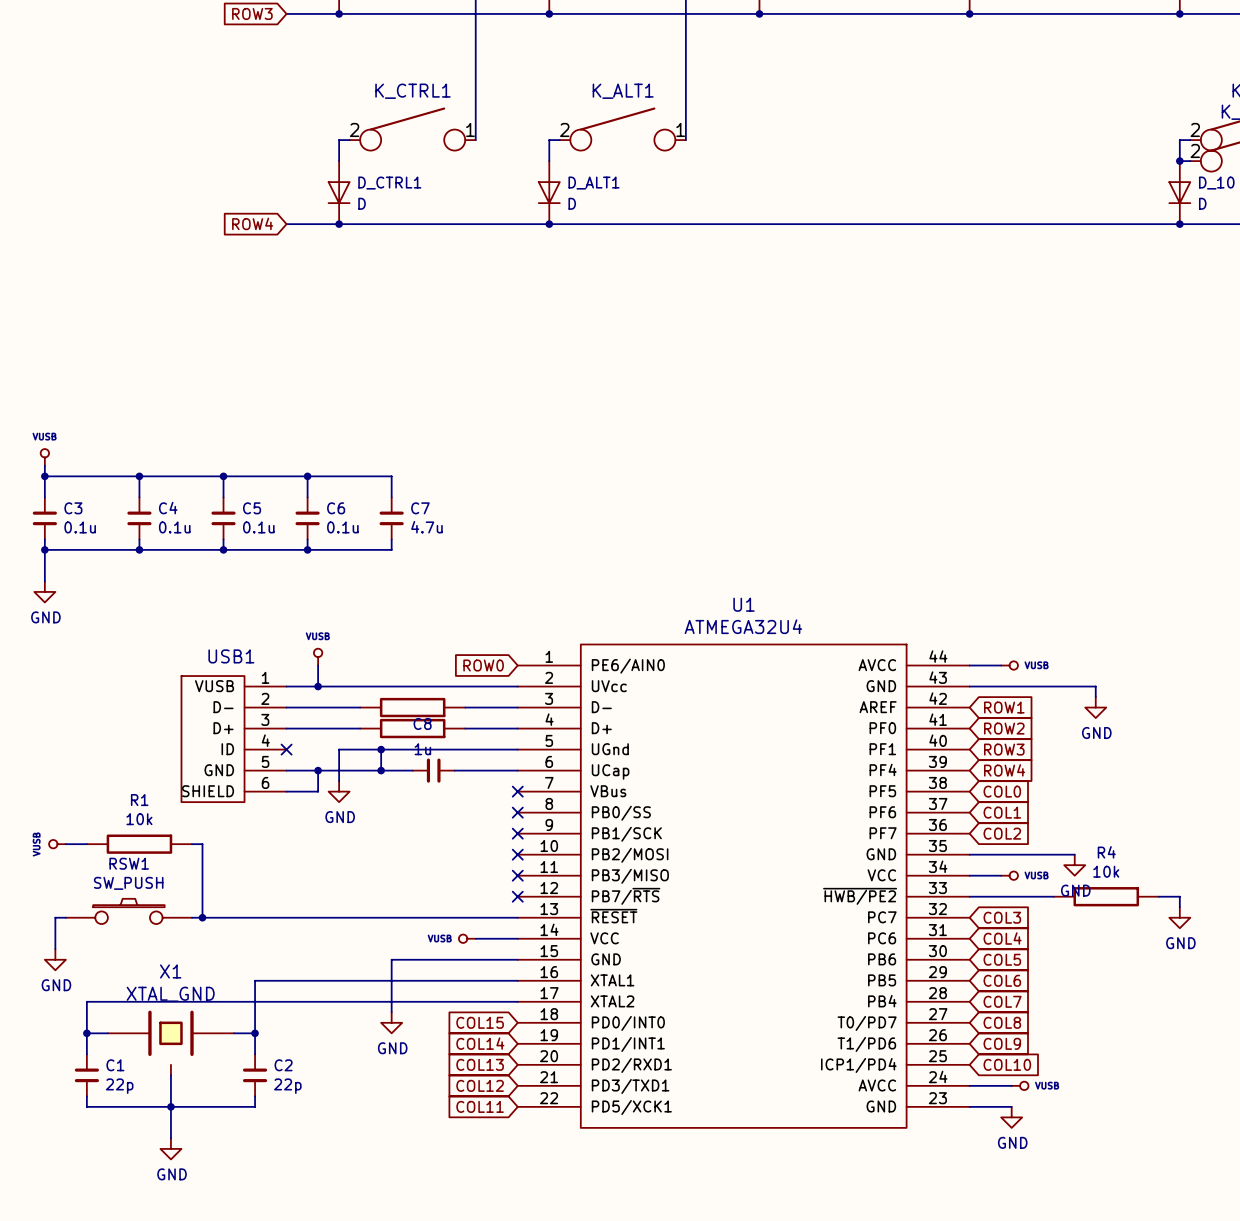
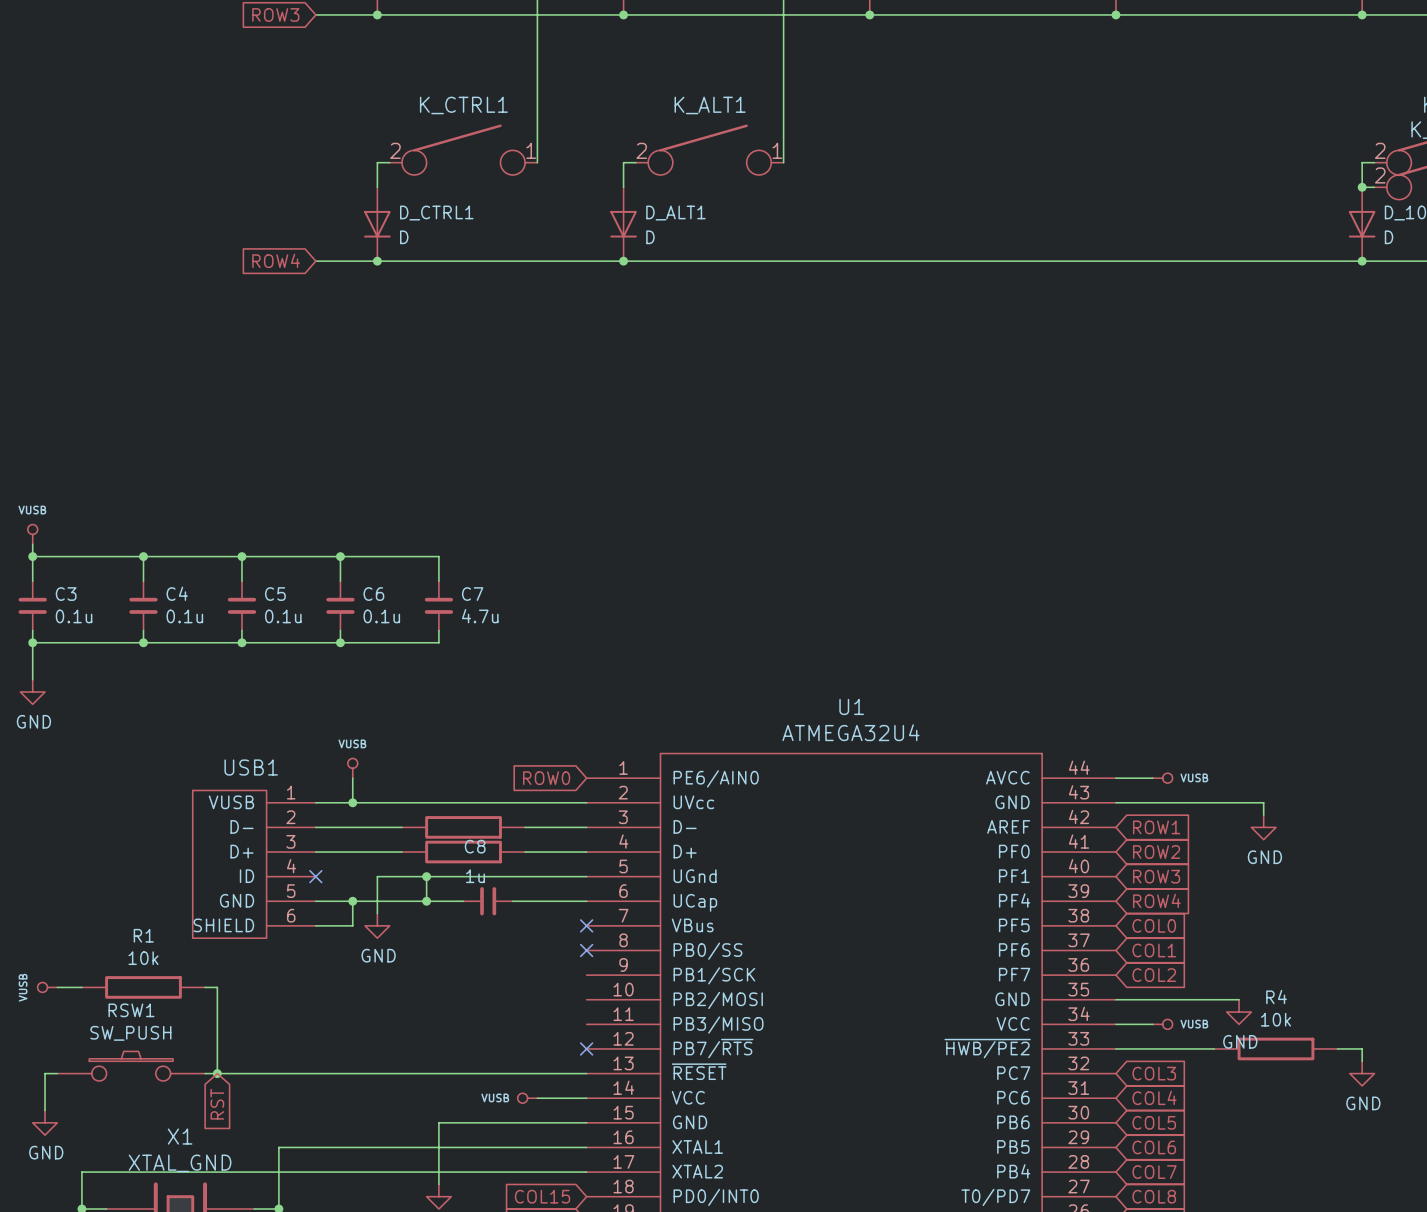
no-connect mark: (517, 833) -> none
no-connect mark: (517, 854) -> none
no-connect mark: (517, 875) -> none
global label: none -> RST (217, 1104)

